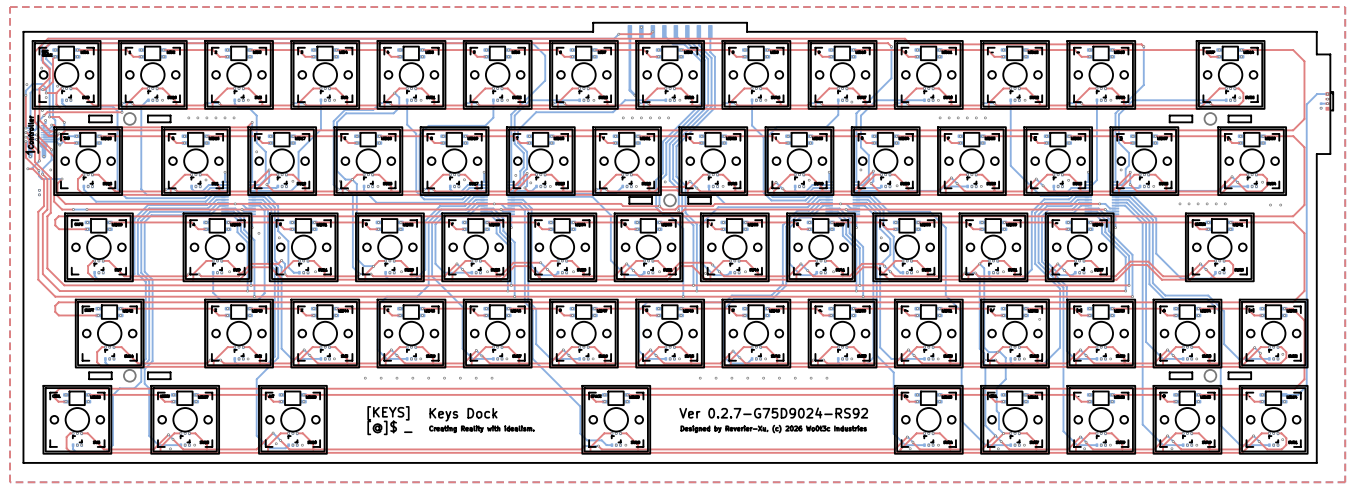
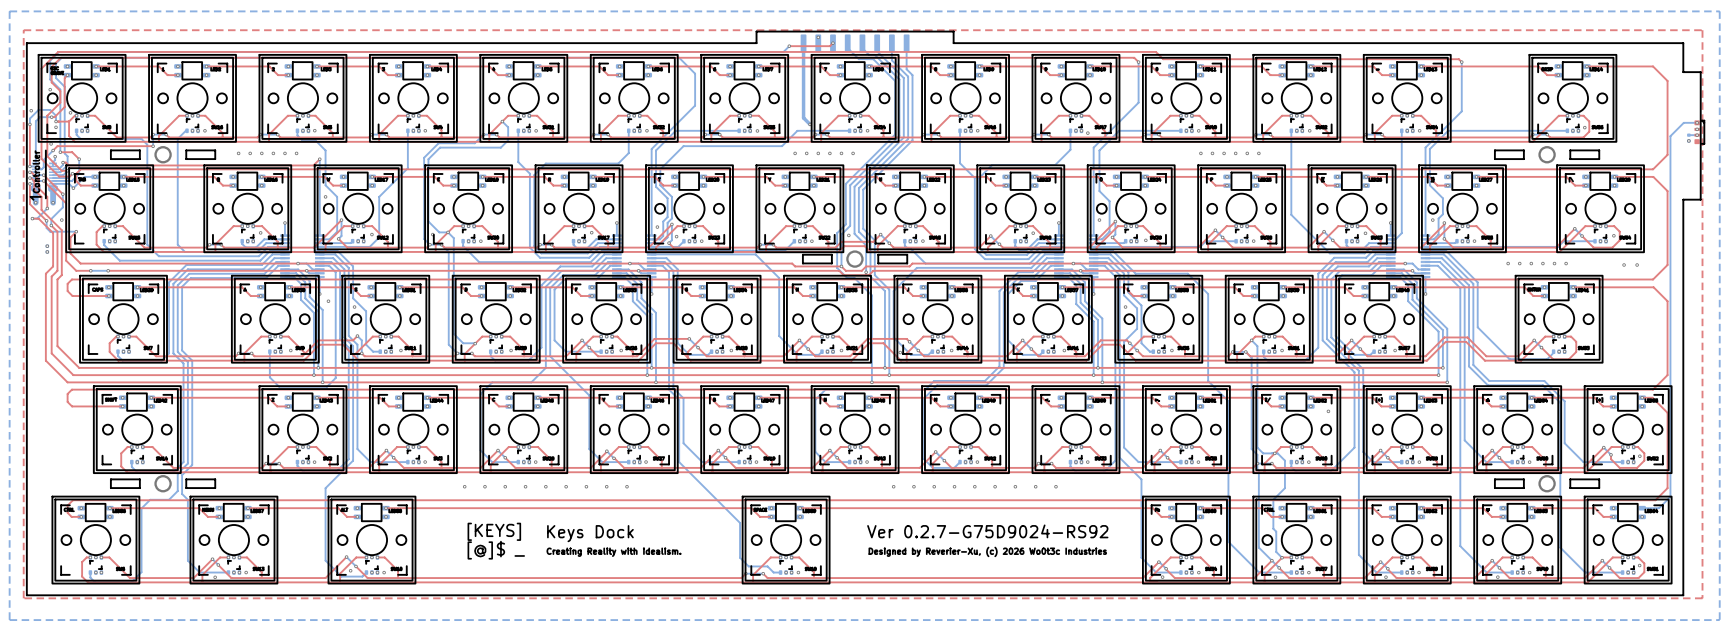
top zone outline: (10, 7) (1345, 7) (1345, 482) (10, 482) (10, 7) -> (23, 30) (23, 598) (1702, 598) (1702, 30) (23, 30)

